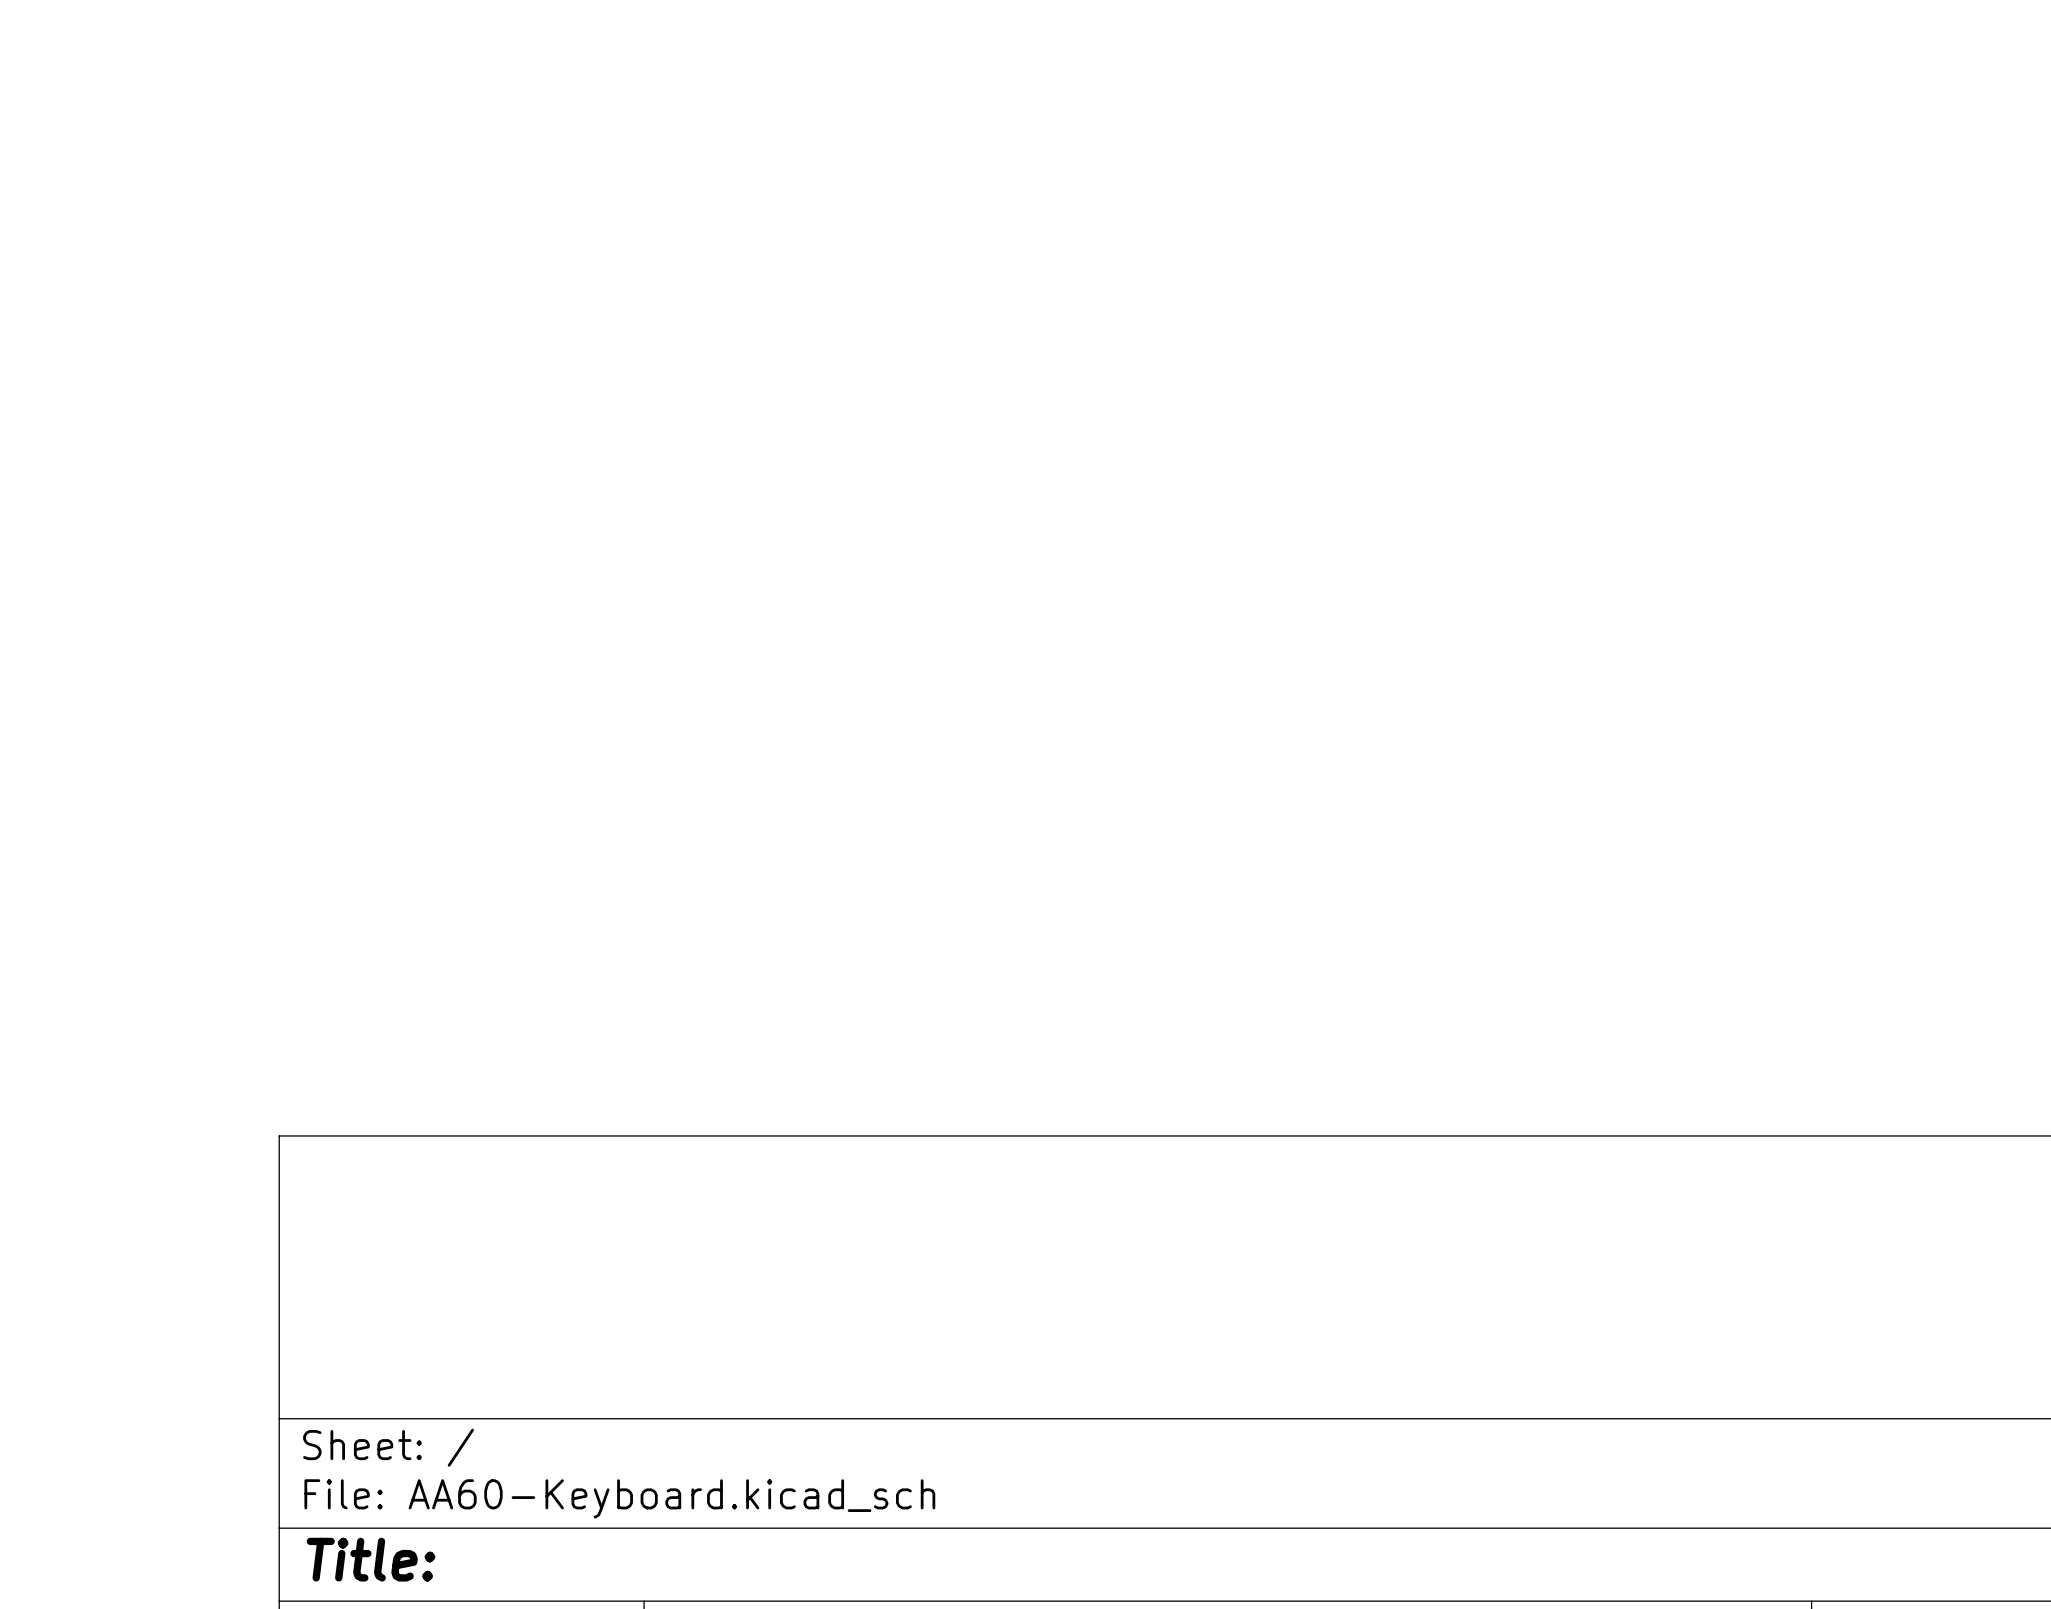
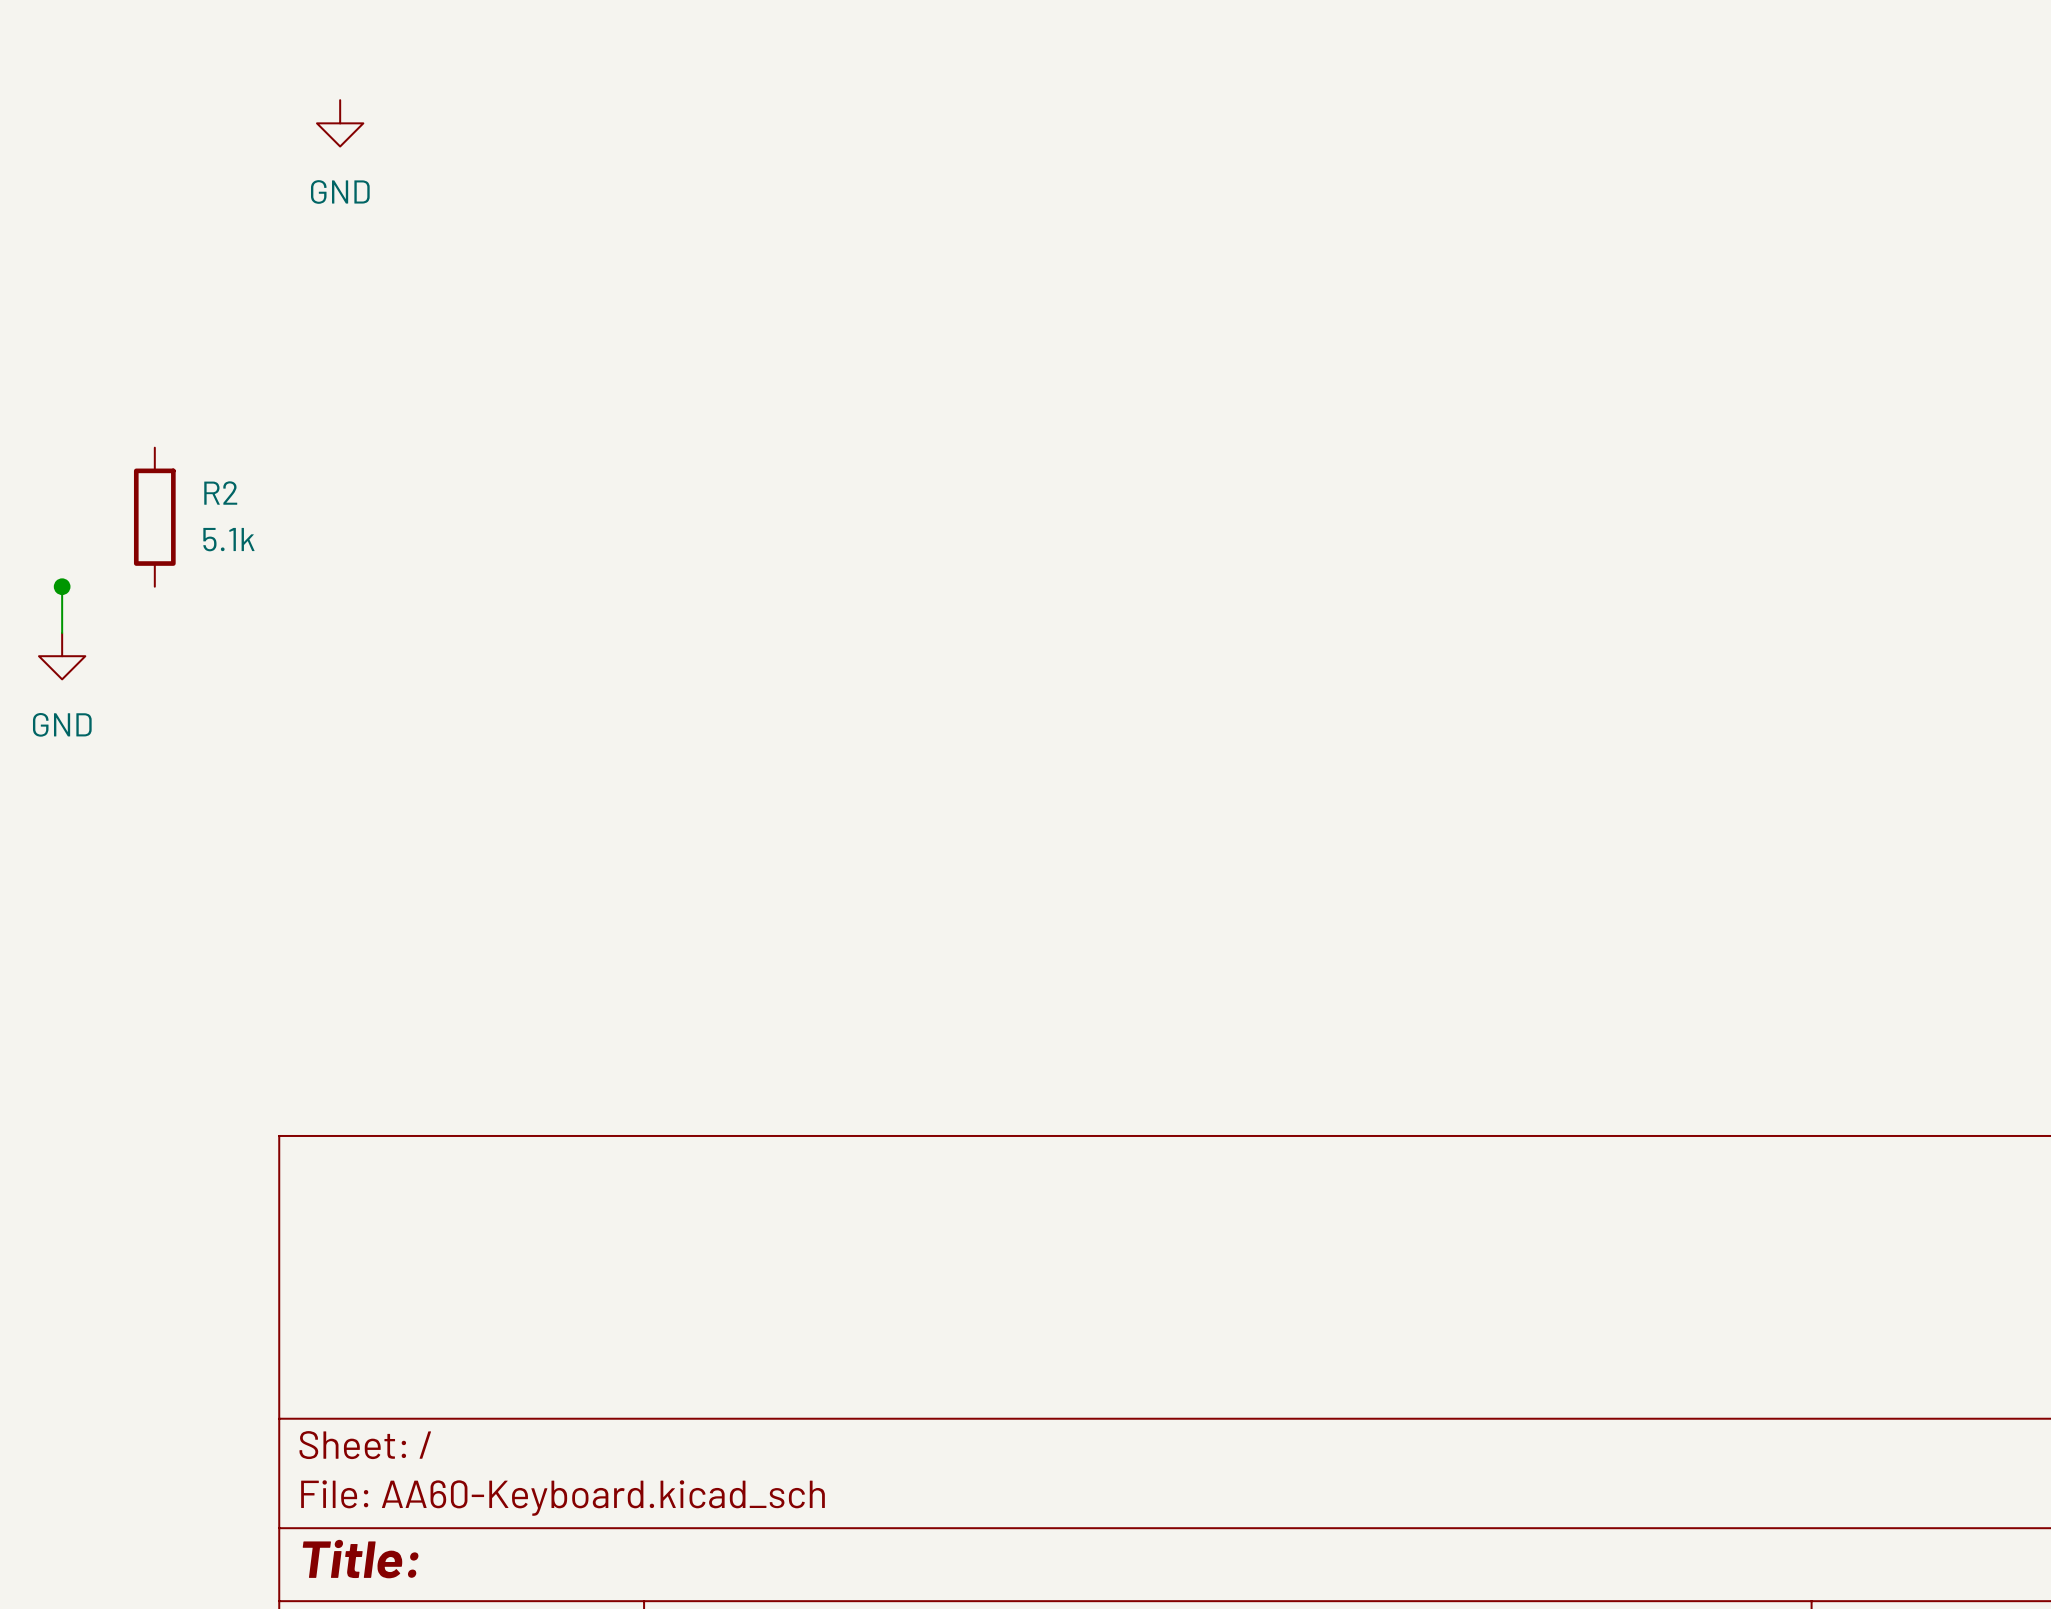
power symbol: none -> GND (340, 123)
R2: none -> 5.1k (154, 517)
wire: none -> (62, 586) (62, 633)
junction: none -> (62, 586)
power symbol: none -> GND (62, 656)

